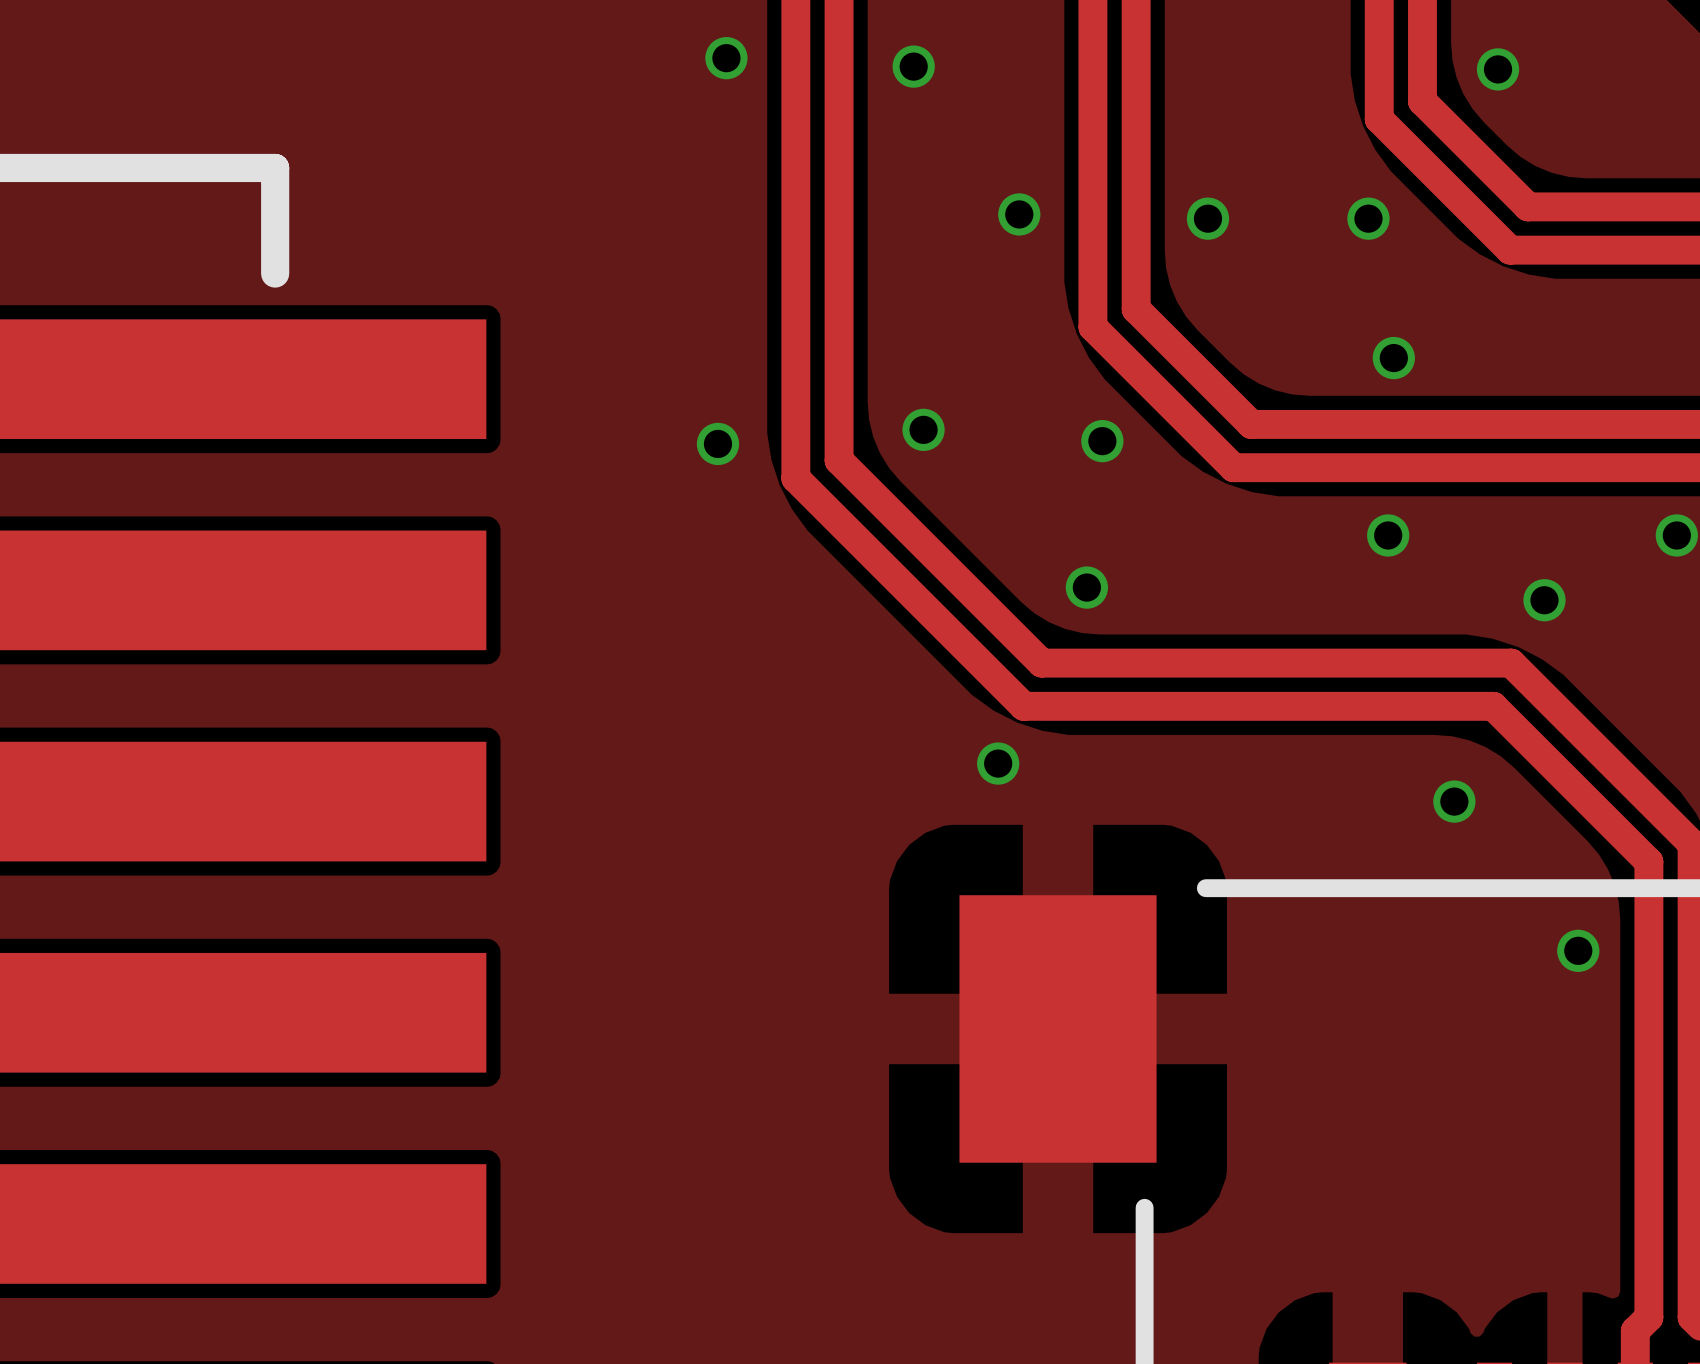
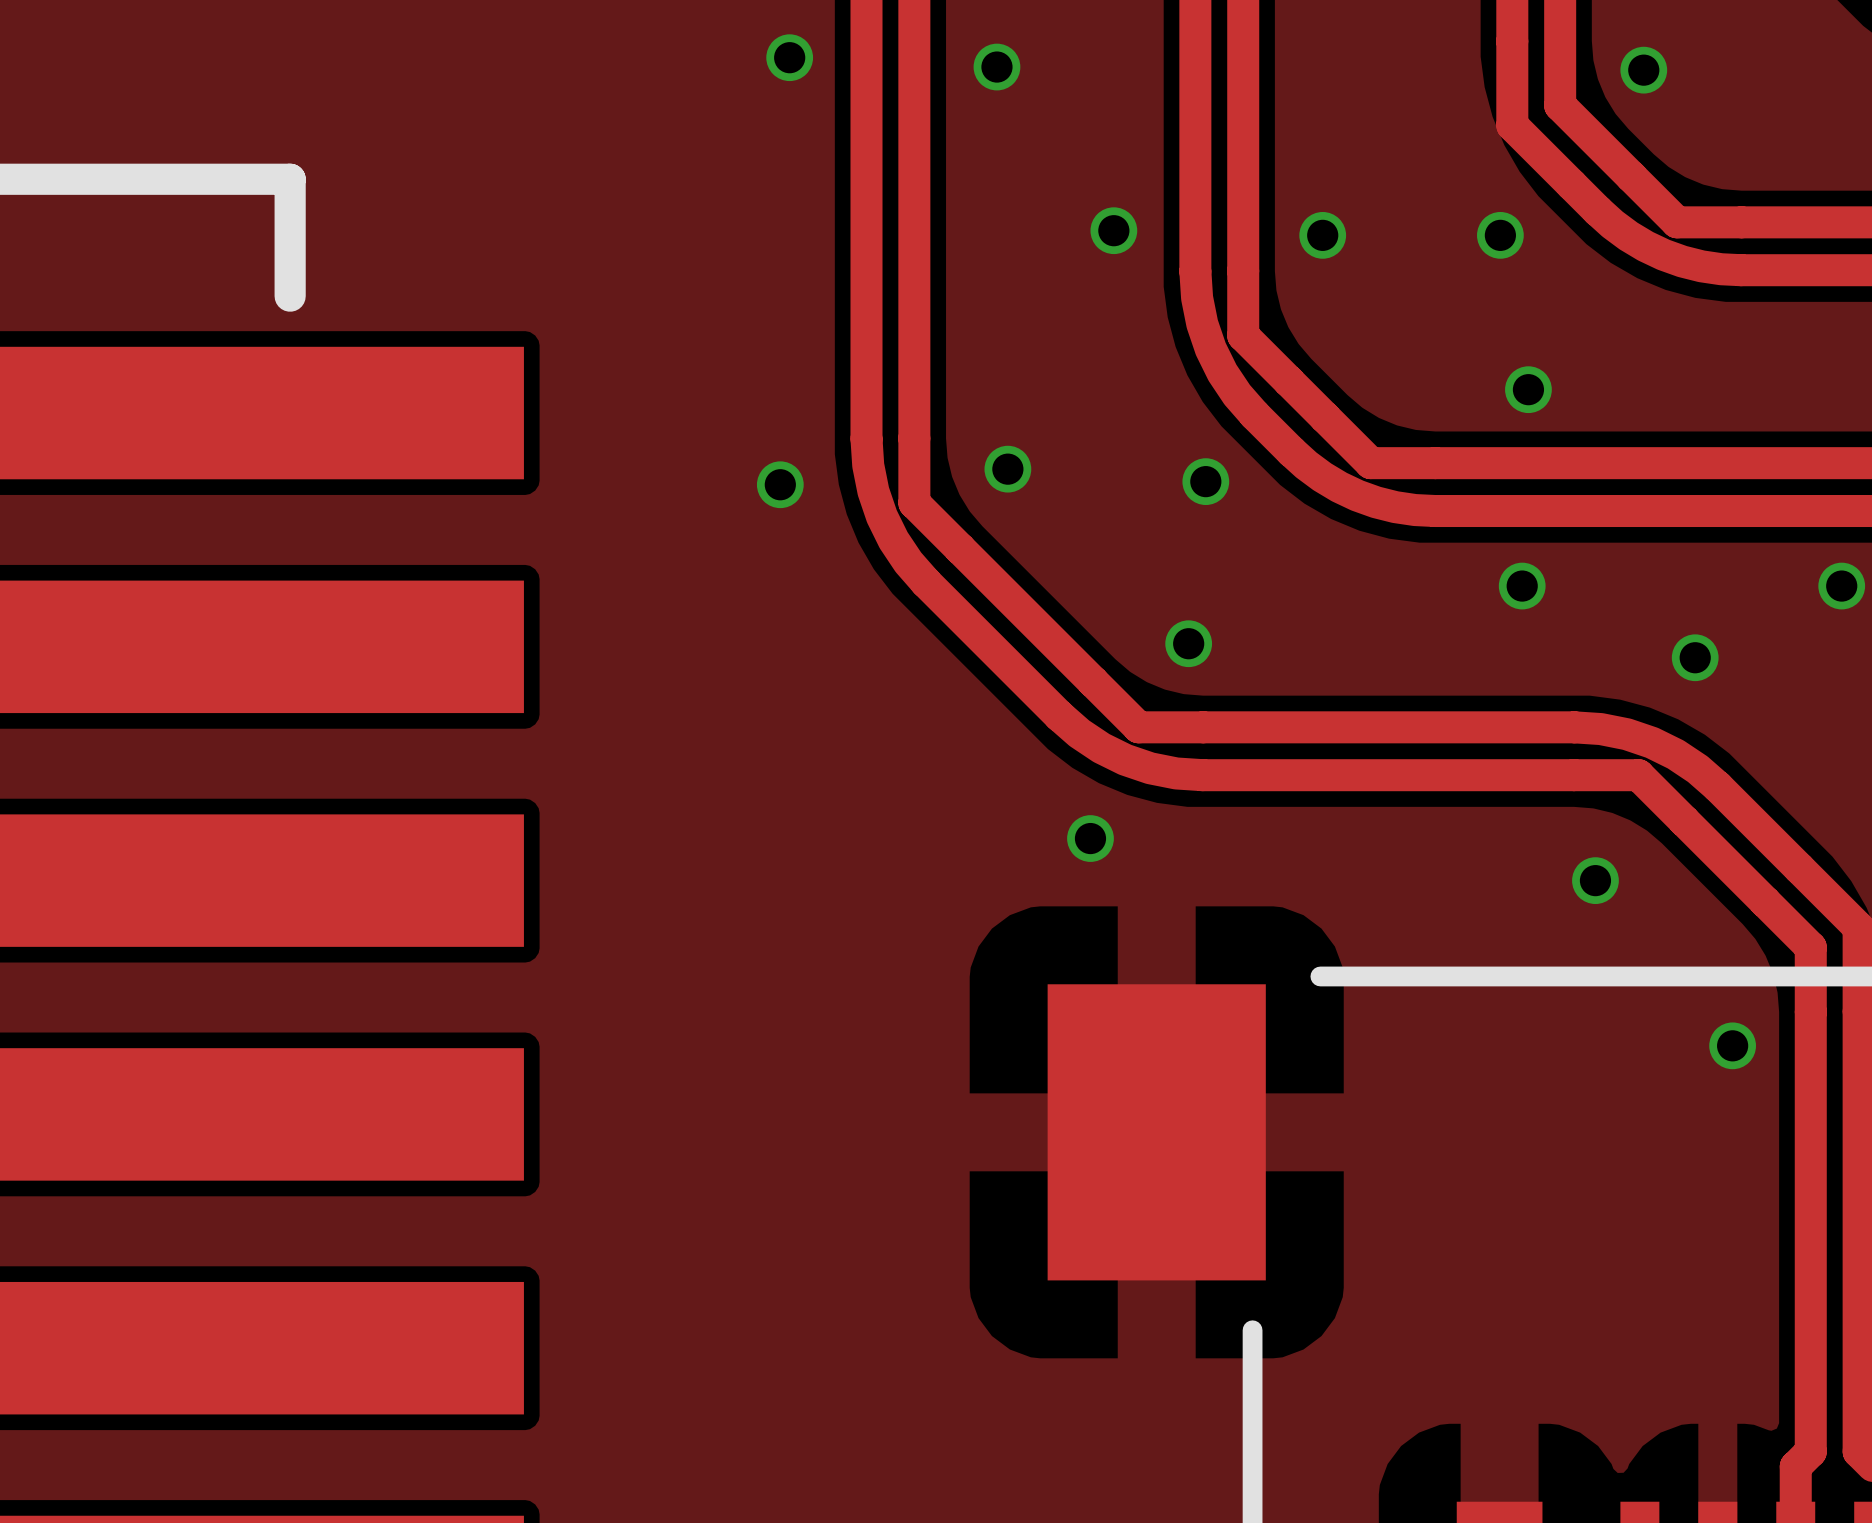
track: (1456, 196) (1510, 250) (1586, 250) -> (1597, 210) (1628, 236) (1663, 254) (1701, 266) (1741, 270)
track: (1092, 251) (1092, 327) (1146, 380) -> (1195, 271) (1197, 297) (1202, 323) (1210, 349) (1222, 372) (1237, 394) (1254, 414)
track: (795, 402) (795, 478) (849, 531) -> (866, 438) (868, 465) (873, 491) (881, 516) (893, 540) (908, 562) (925, 582)
track: (1179, 414) (1233, 467) (1309, 467) -> (1291, 451) (1322, 476) (1357, 495) (1395, 507) (1434, 511)
track: (970, 652) (1023, 706) (1099, 706) -> (1059, 715) (1079, 733) (1101, 748) (1125, 759) (1150, 768) (1176, 773) (1202, 775)
track: (1435, 663) (1511, 663) (1564, 716) -> (1574, 727) (1600, 729) (1626, 734) (1651, 742) (1675, 754) (1697, 769) (1717, 786)

